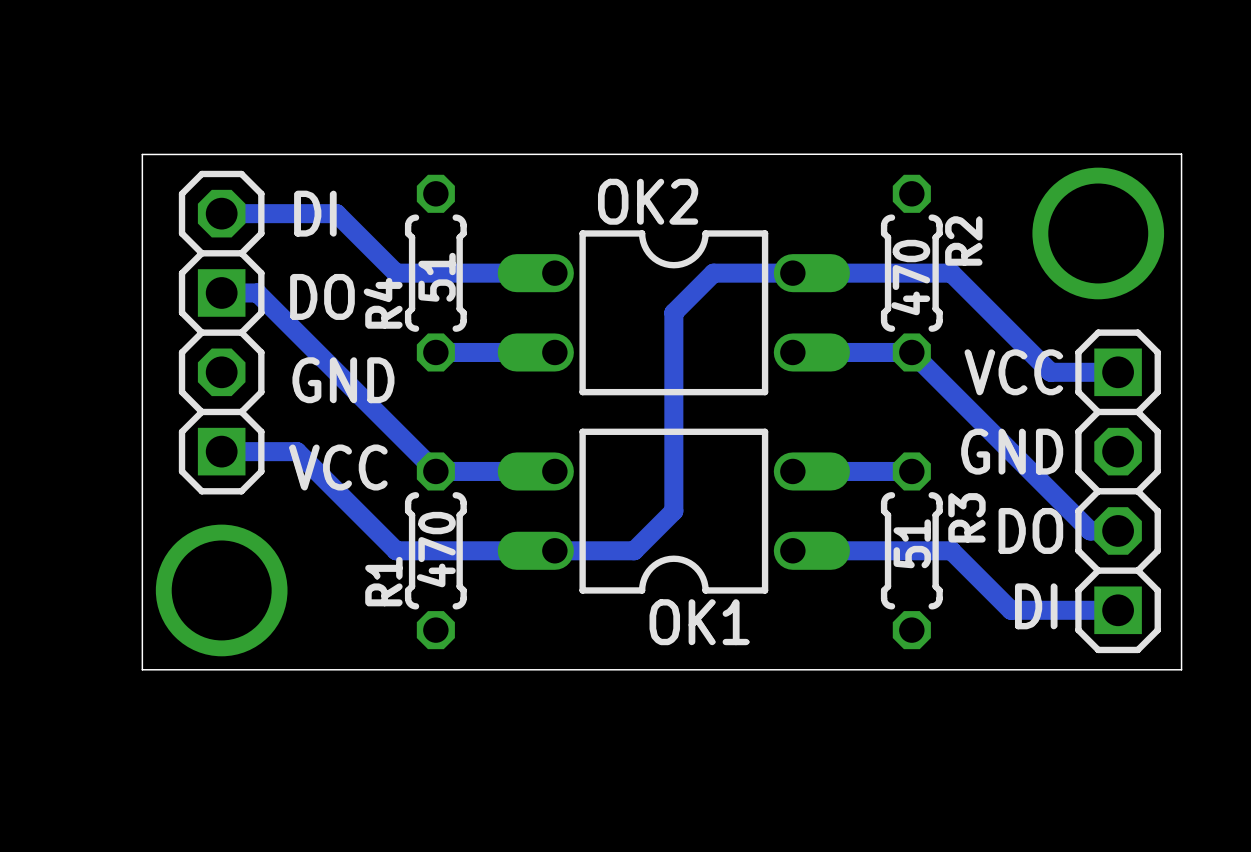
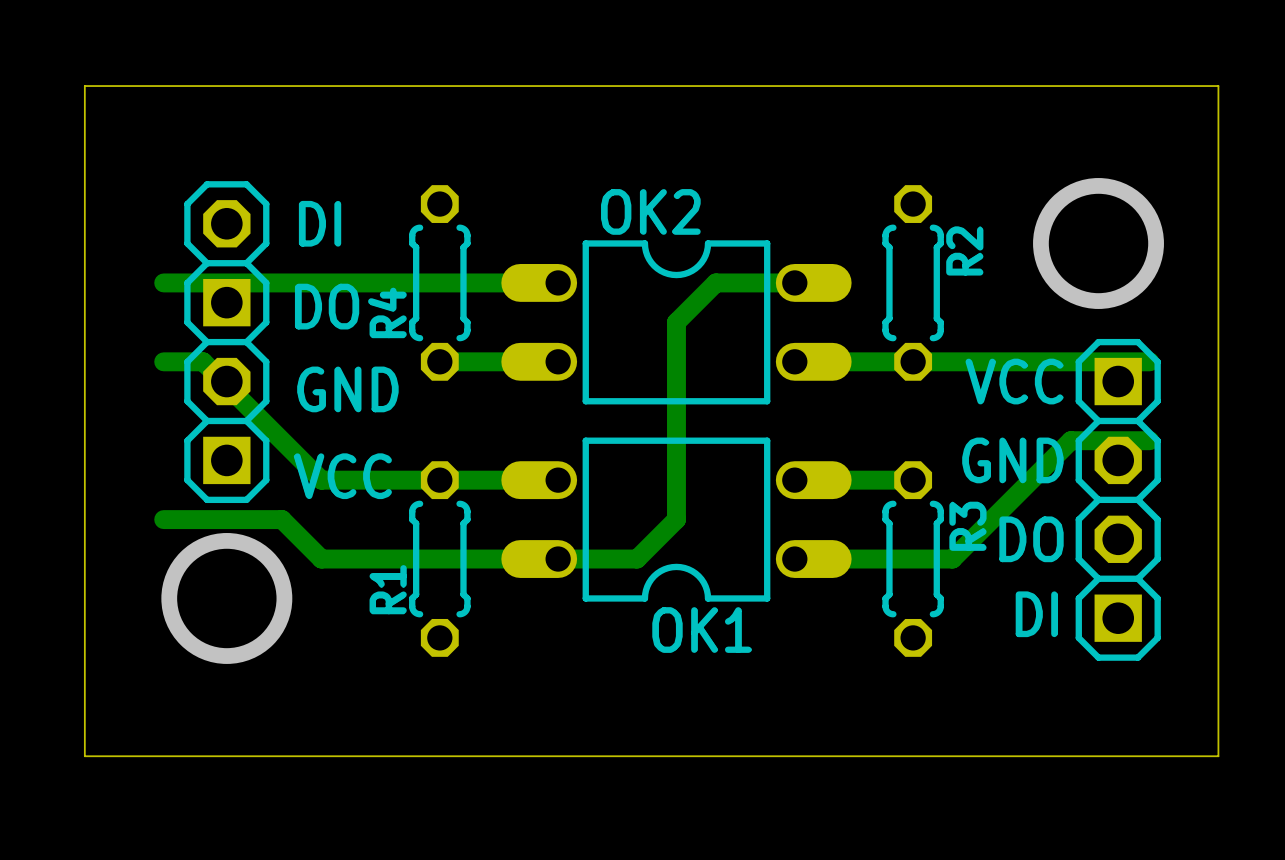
board edge: (1181, 154) (1181, 669) (142, 669) (142, 154) (1181, 154) -> (84, 86) (84, 756) (1218, 756) (1218, 86) (84, 86)
bottom track: (221, 213) (336, 213) (396, 273) -> (163, 282) (400, 282)
bottom track: (792, 273) (951, 273) (1050, 372) (1118, 372) -> none
text: 51 (437, 277) -> none
text: 470 (910, 277) -> none
bottom track: (221, 292) (257, 292) (435, 471) -> none
bottom track: (911, 352) (1090, 530) (1118, 530) -> (913, 361) (1149, 361)
bottom track: (221, 451) (297, 451) -> (163, 361) (203, 361) (301, 460)
bottom track: (316, 471) (396, 550) -> (321, 480) (439, 480)
bottom track: none -> (163, 519) (282, 519) (321, 559) (400, 559)
text: 51 (912, 543) -> none
text: 470 (436, 549) -> none
bottom track: (951, 550) (1010, 610) (1118, 610) -> (952, 559) (1070, 440) (1149, 440)

